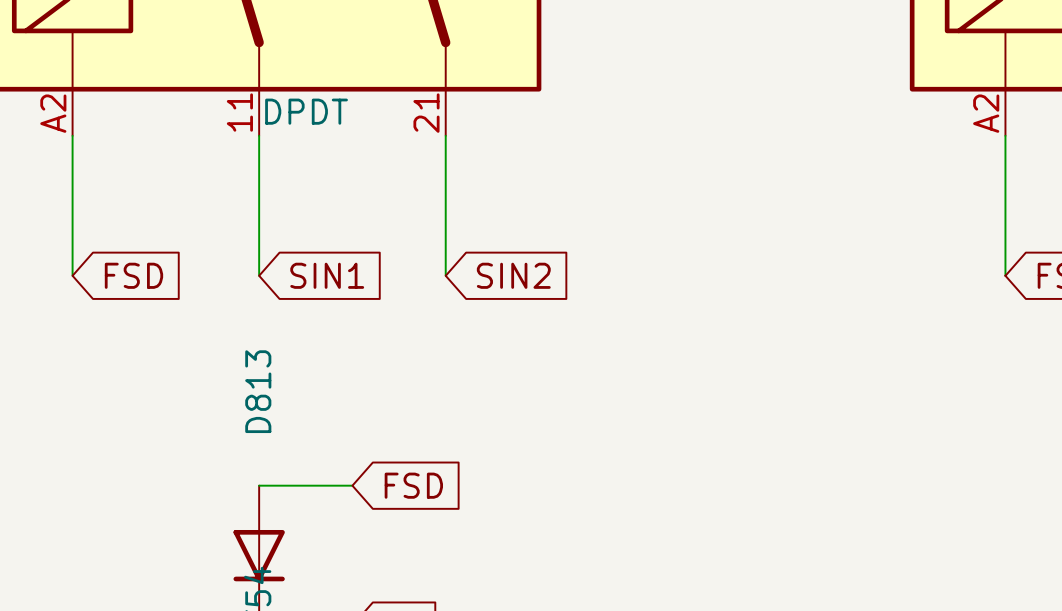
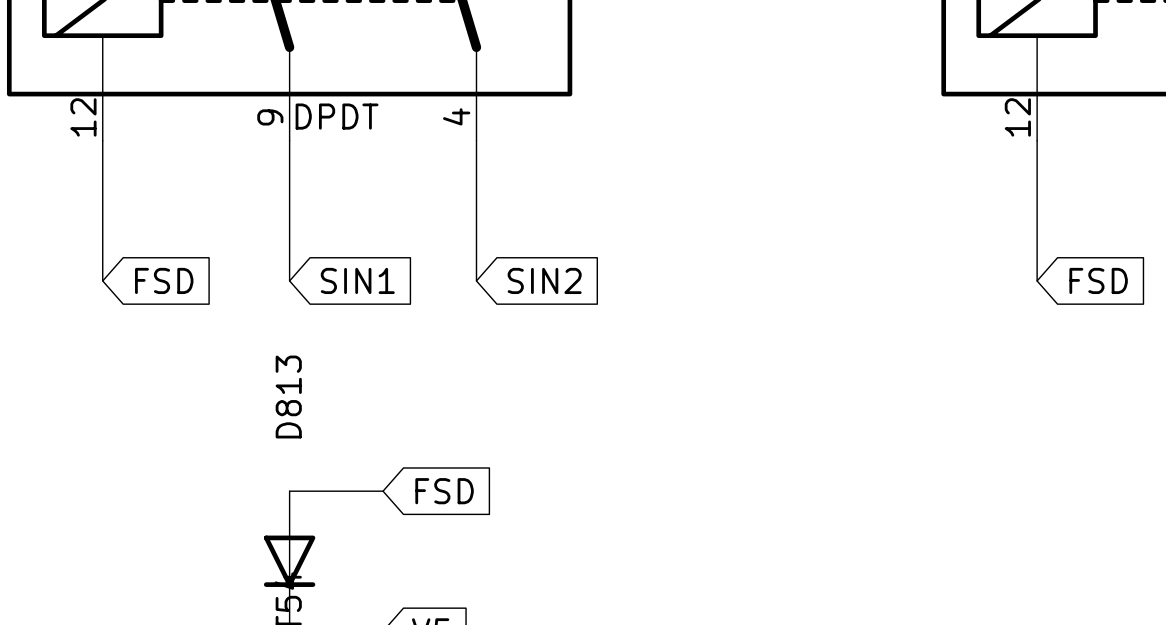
part pin number: 11 (239, 112) -> 9 (270, 117)
part pin number: A2 (53, 113) -> 12 (83, 117)
part pin number: 21 (426, 113) -> 4 (456, 116)
part pin number: A2 (986, 113) -> 12 (1017, 117)

